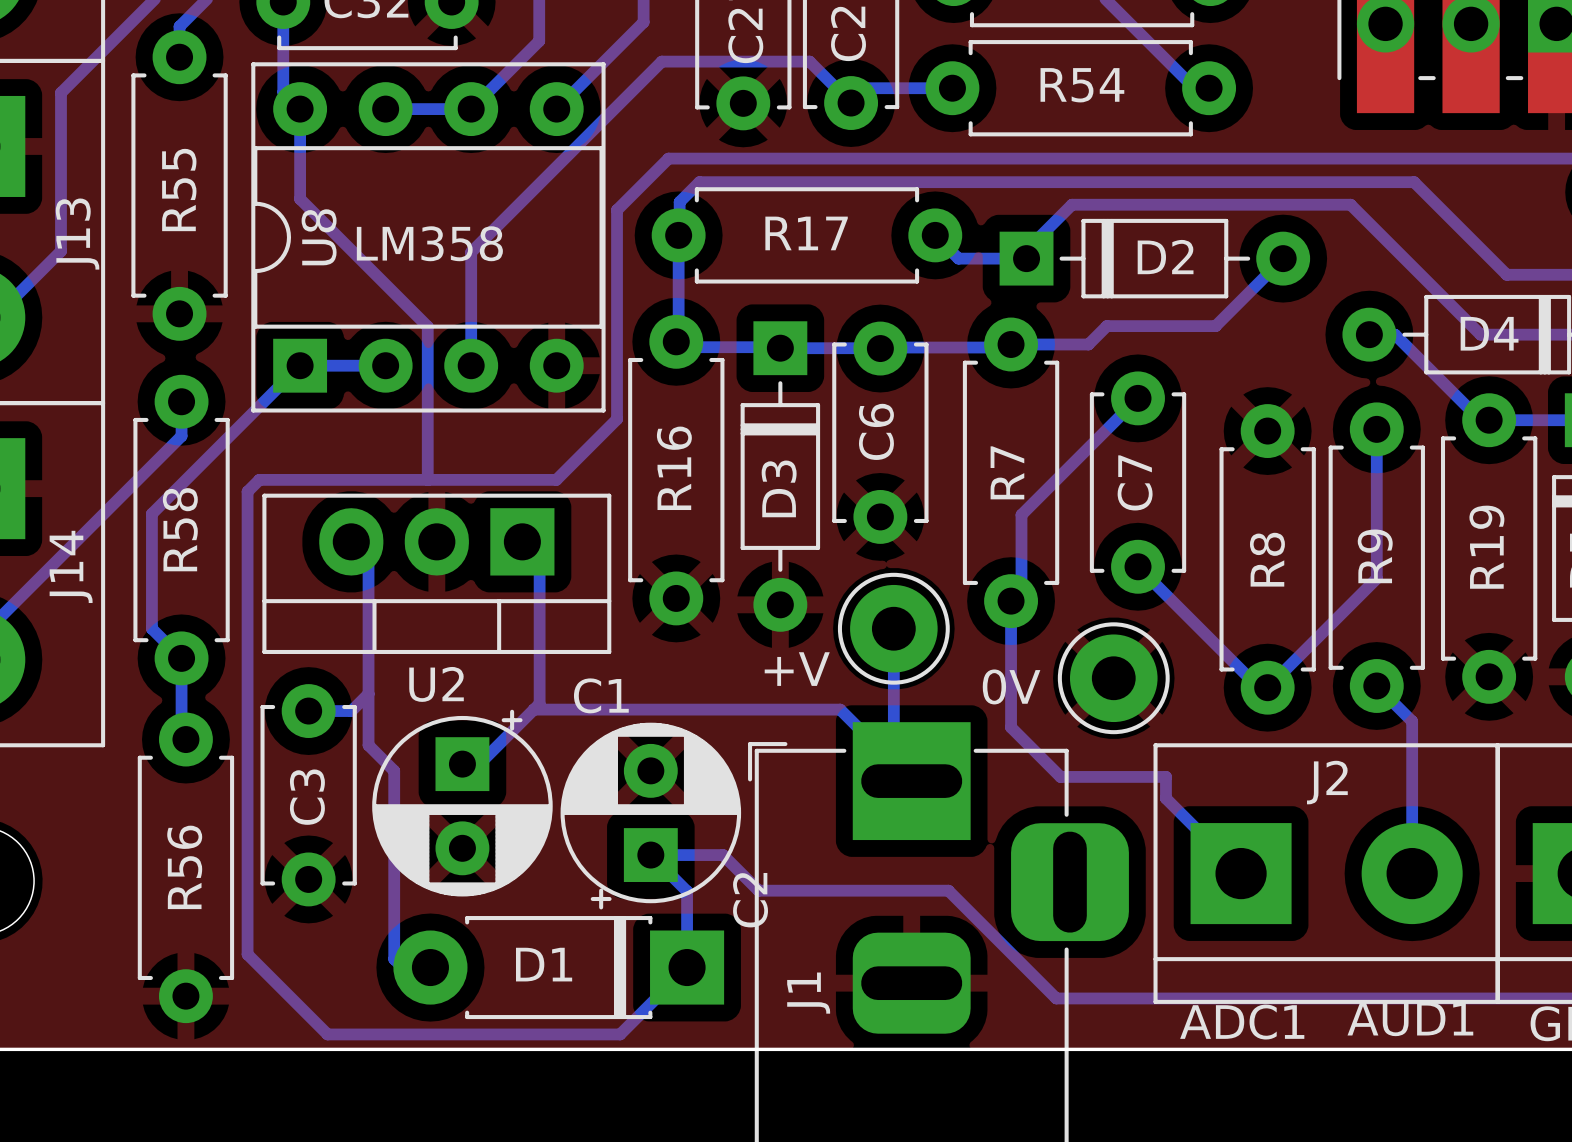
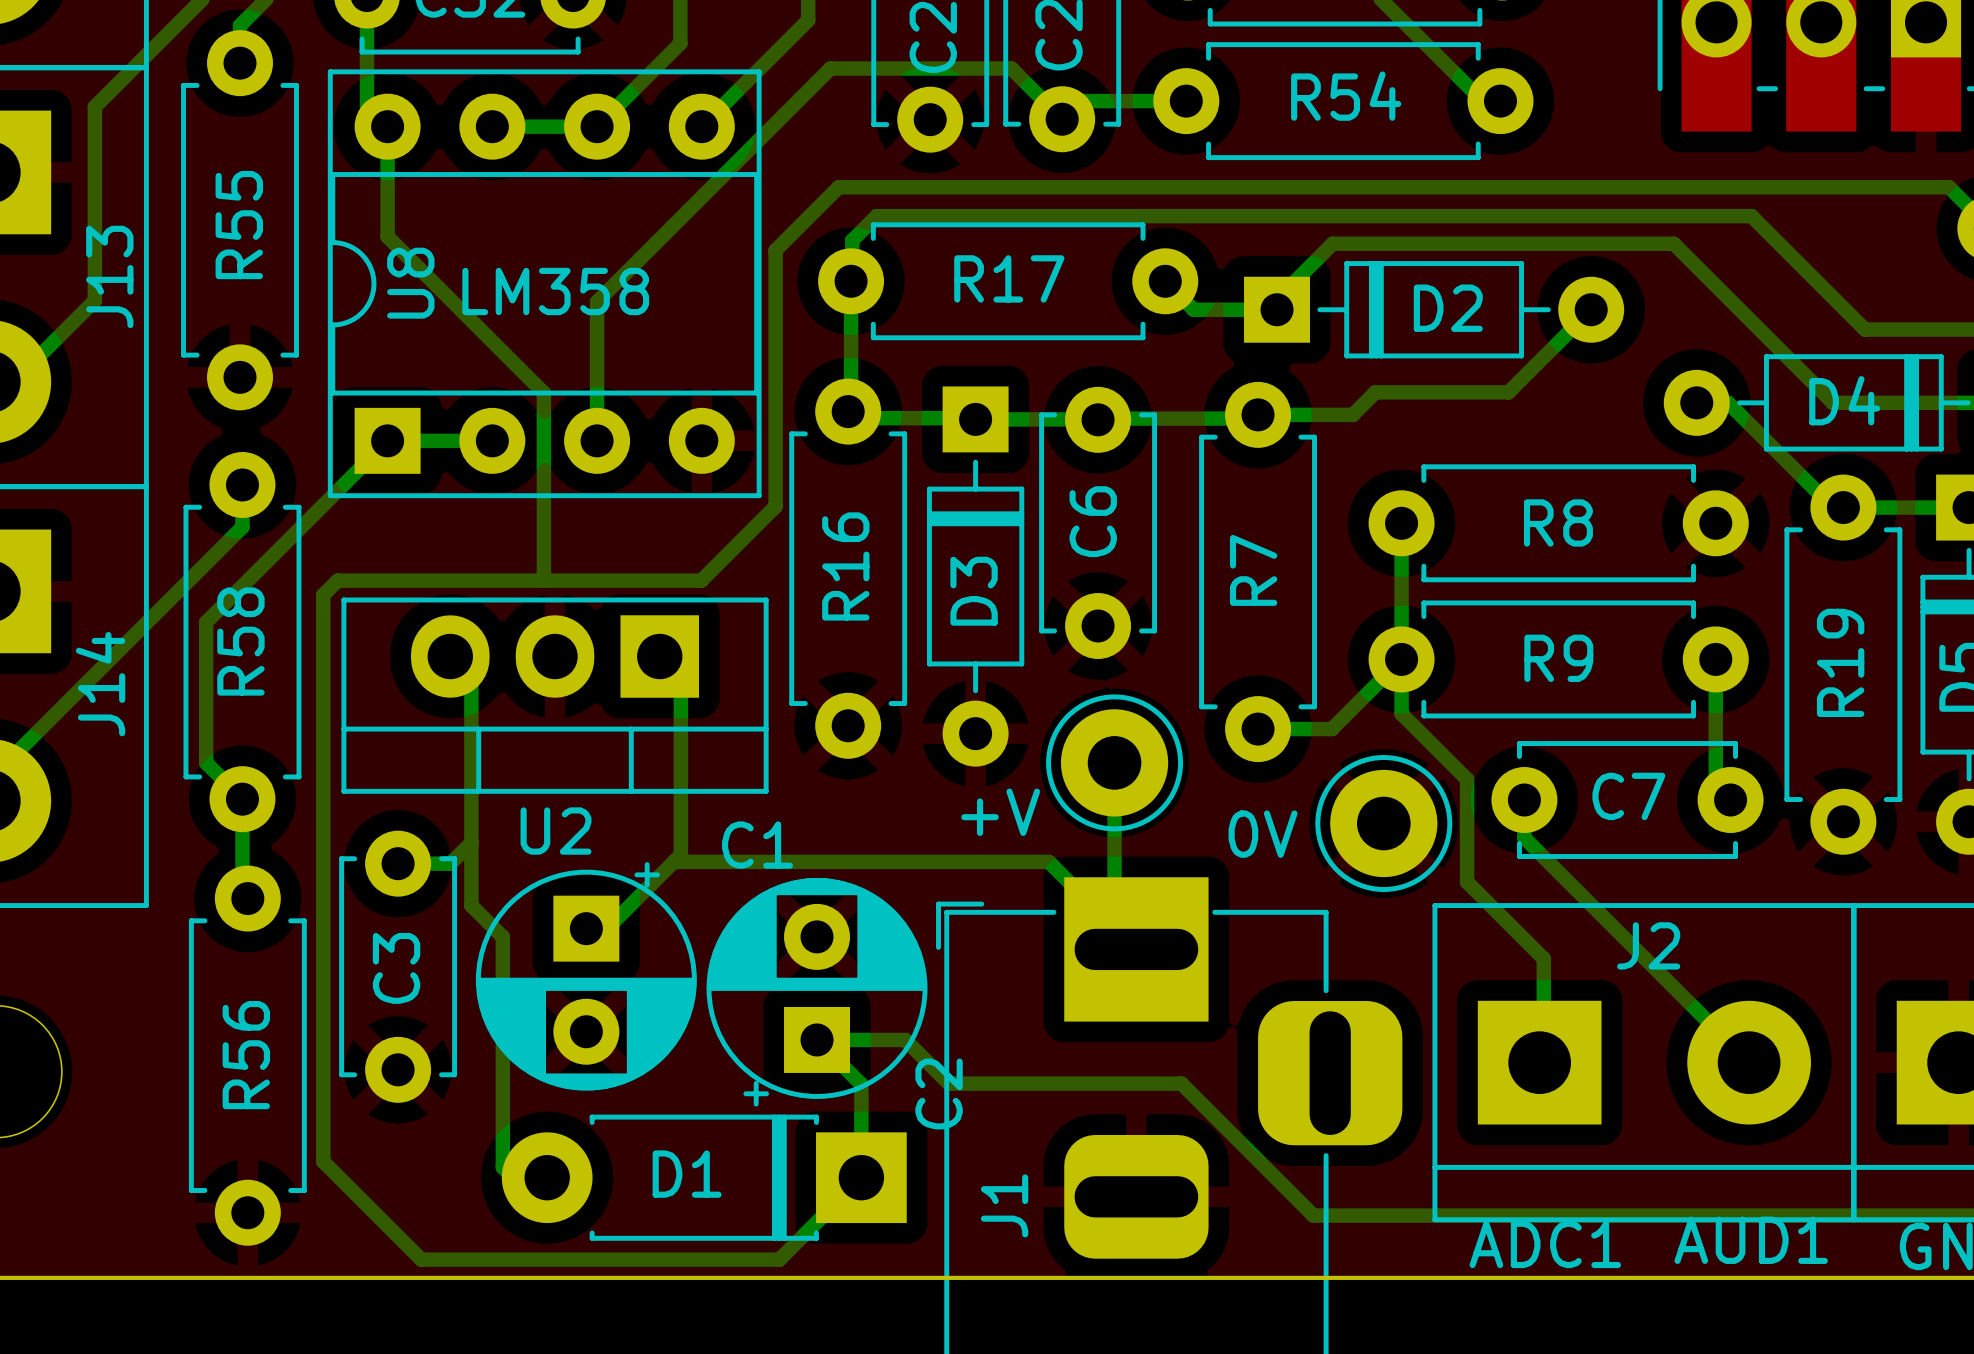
bottom track: (1138, 398) (1021, 514) (1021, 590) (1011, 601) (1011, 727) (1060, 776) (1165, 776) (1165, 798) (1241, 873) -> (1401, 523) (1401, 713) (1467, 779) (1467, 882) (1543, 958) (1543, 1058) (1539, 1062)
bottom track: (1376, 429) (1376, 578) (1267, 687) (1258, 687) (1138, 566) -> none
C7 rotation: 0° (1138, 482) -> 90° clockwise (1627, 800)
C7 position: (1138, 482) -> (1627, 800)
bottom track: none -> (1401, 659) (1331, 729) (1258, 729)
bottom track: none -> (1715, 659) (1715, 785) (1730, 800)
R9 rotation: 0° (1376, 557) -> 90° clockwise (1558, 659)
R8 rotation: 0° (1267, 559) -> 90° clockwise (1558, 523)
bottom track: (1376, 685) (1412, 721) (1412, 873) -> (1524, 800) (1524, 837) (1749, 1062)

